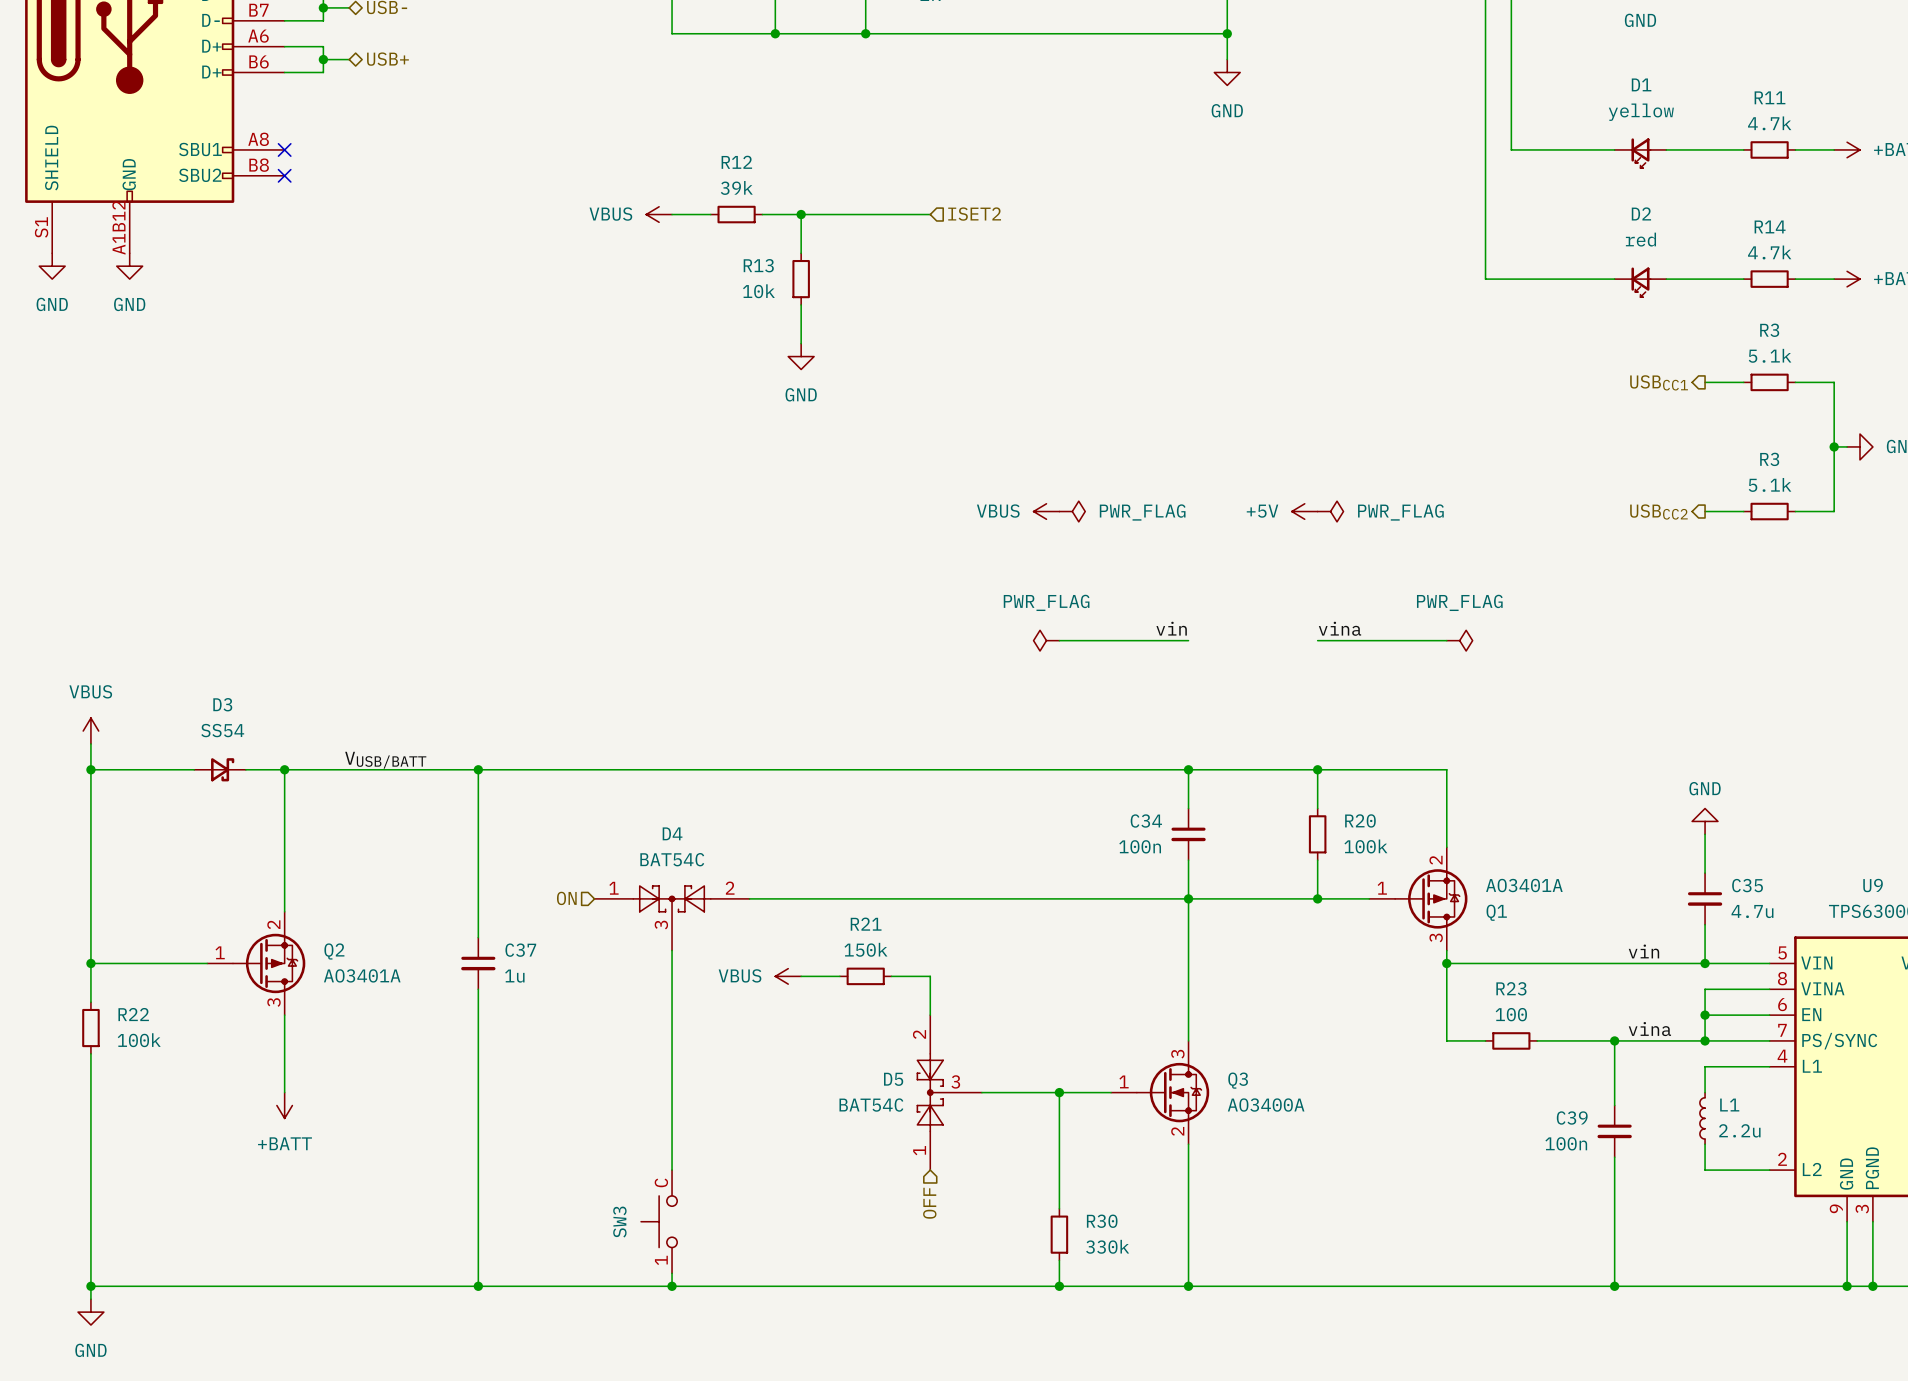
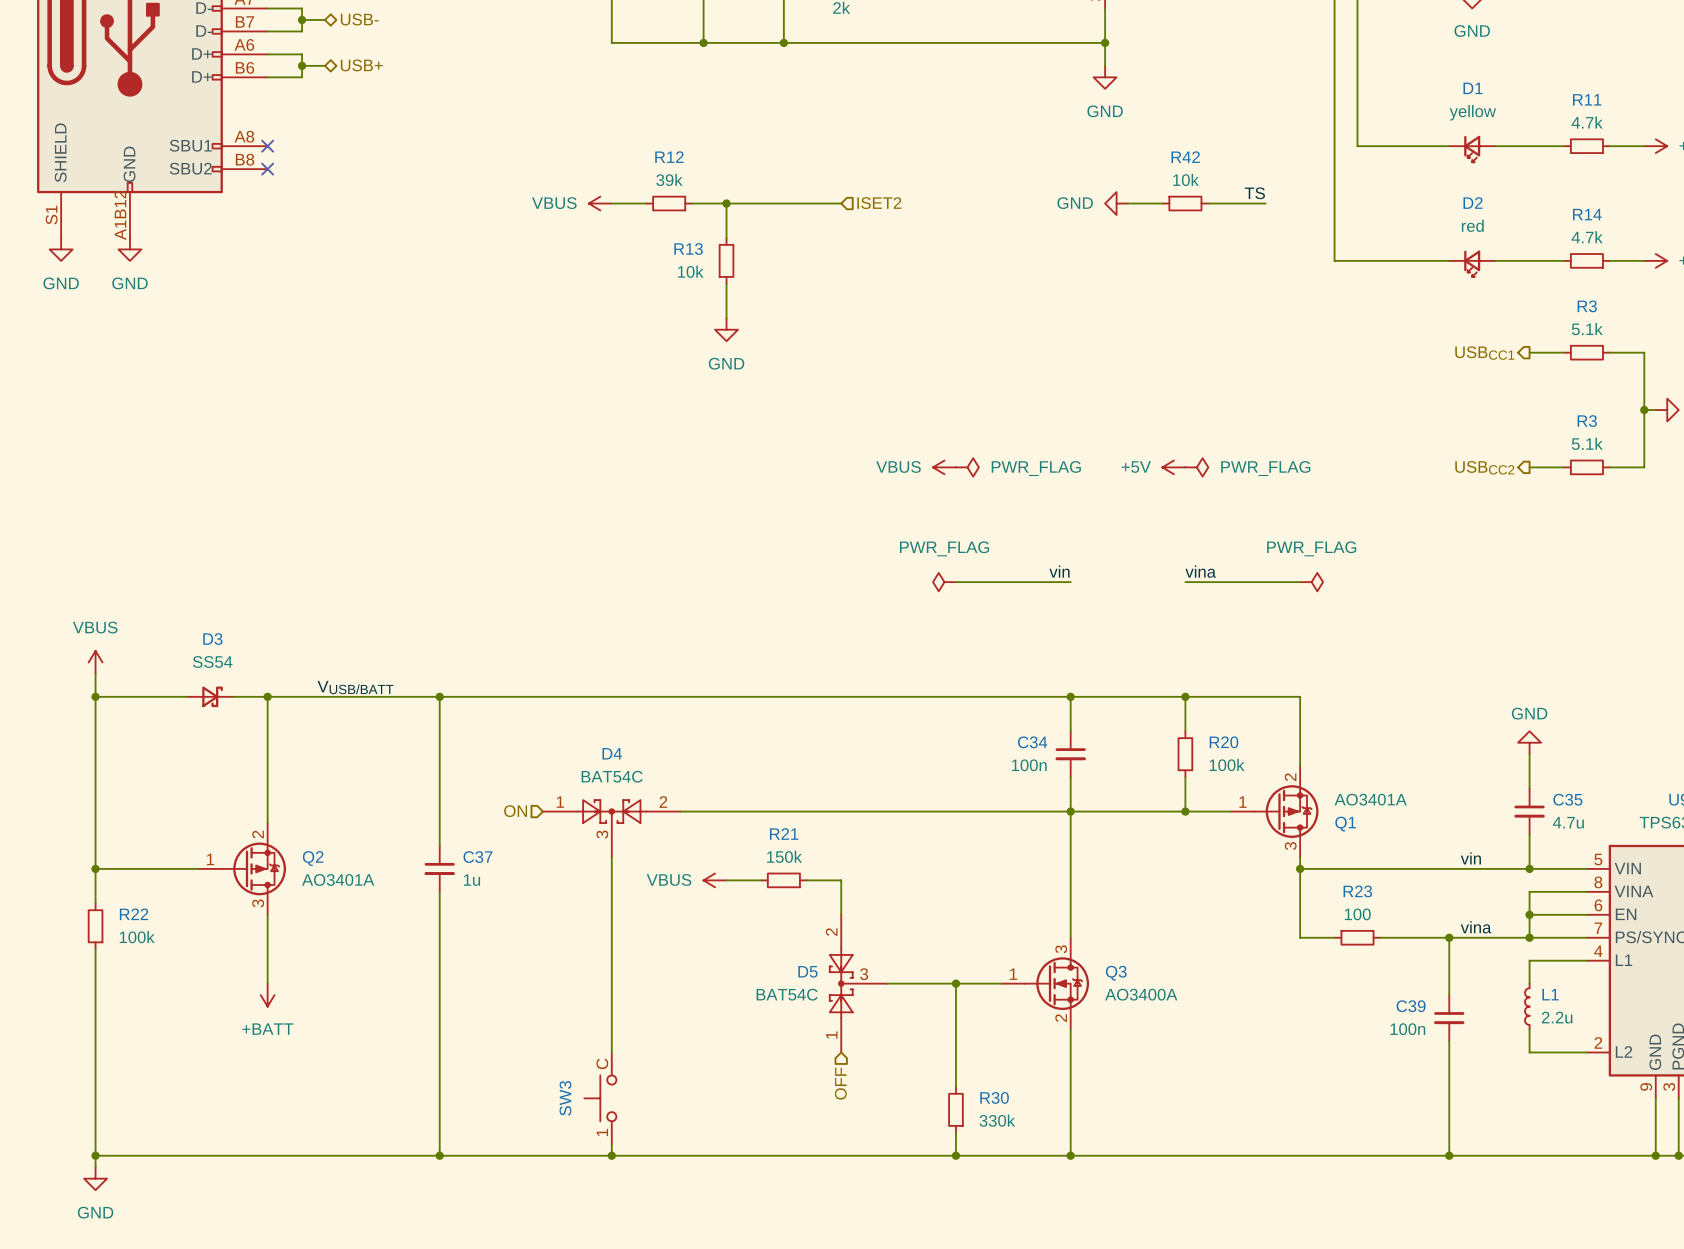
label: none -> TS (1254, 193)
power symbol: none -> GND (1116, 203)
wire: none -> (1128, 203) (1162, 203)
R42: none -> 10k (1185, 203)
wire: none -> (1208, 203) (1265, 203)

